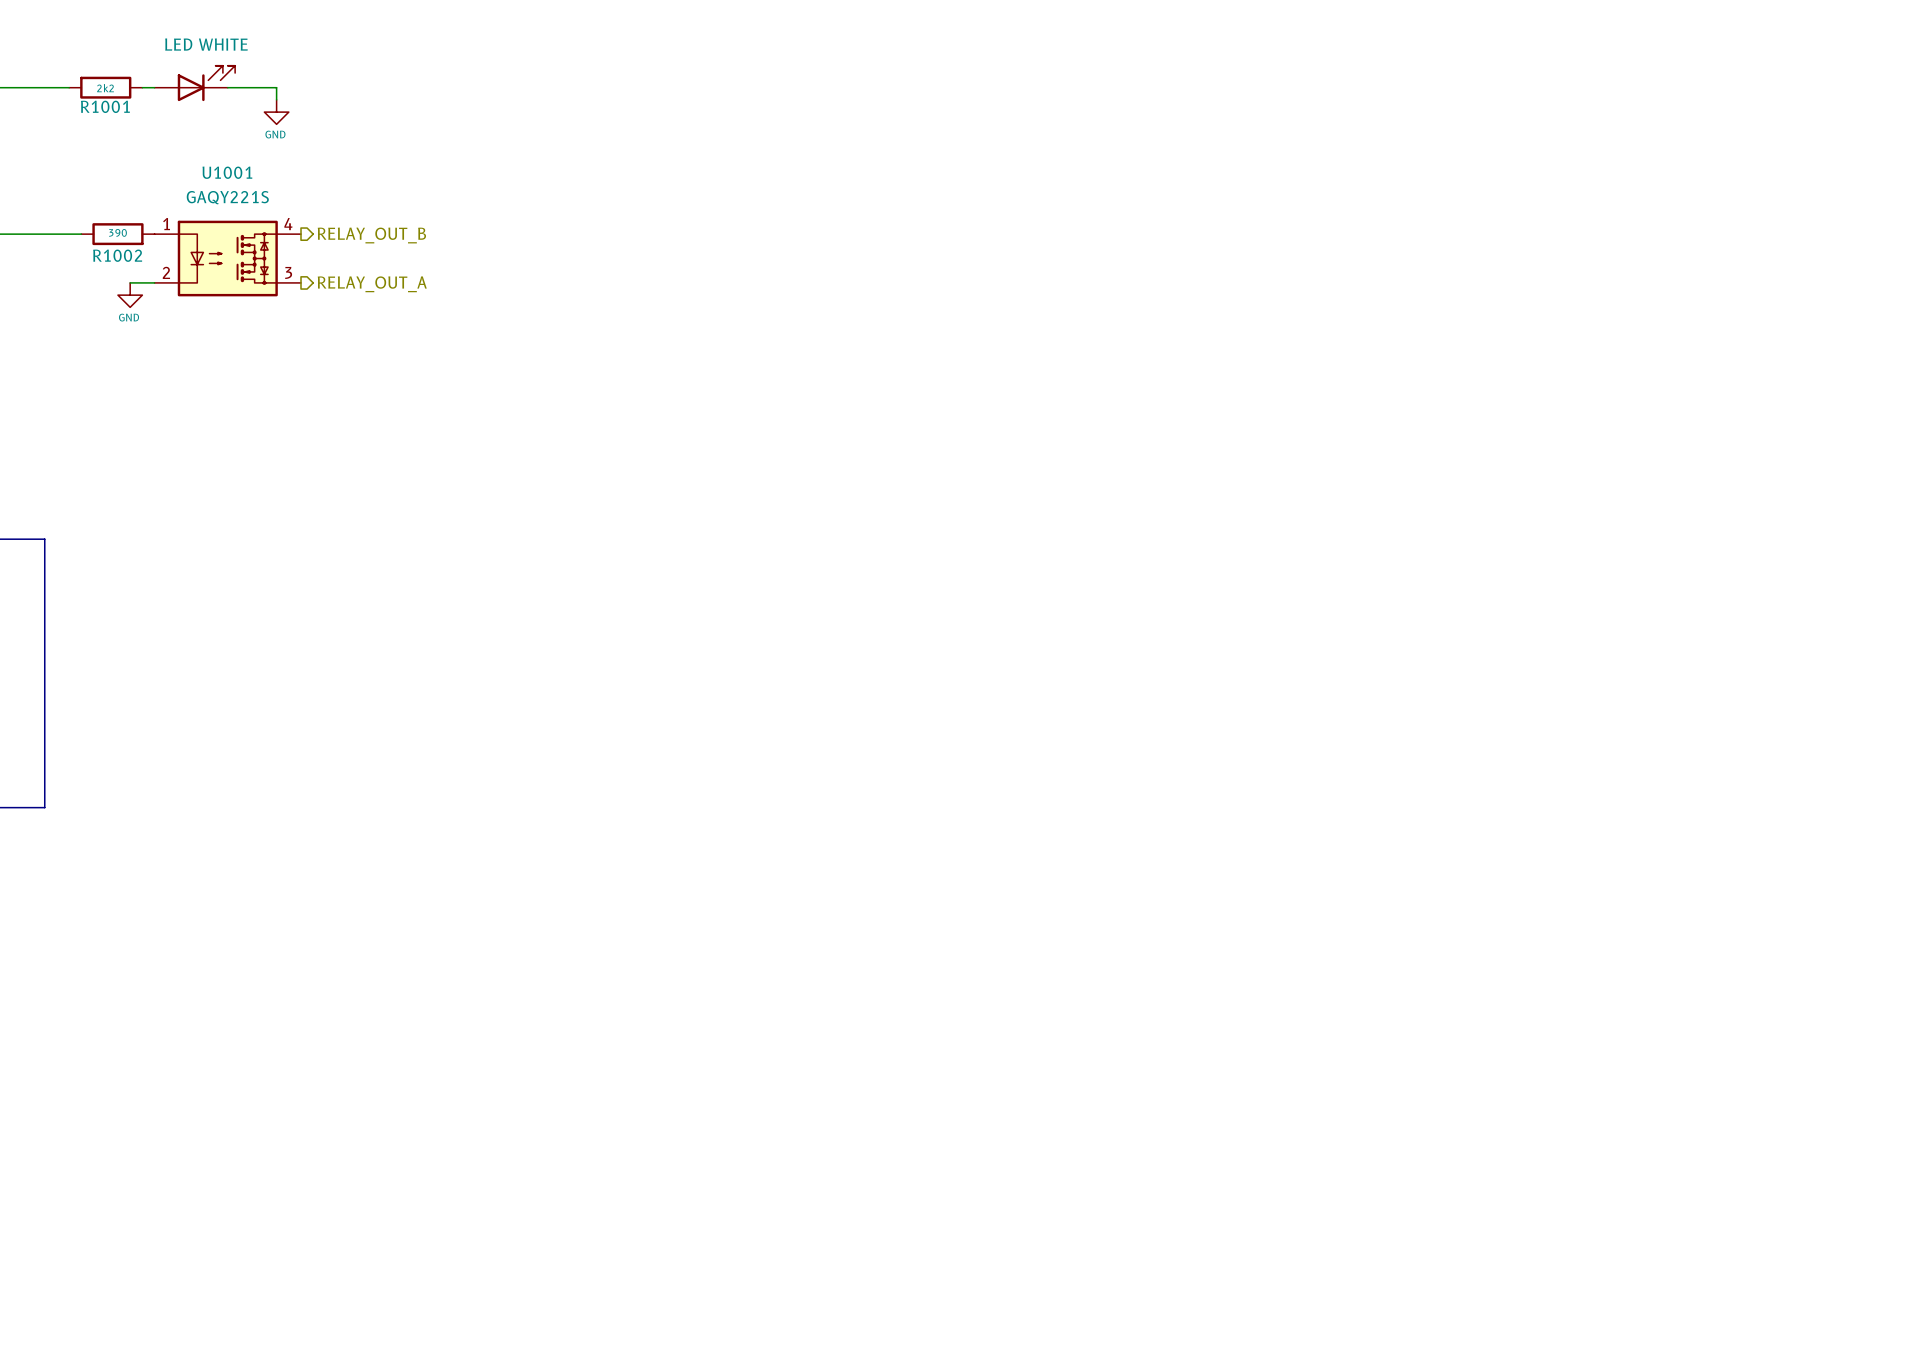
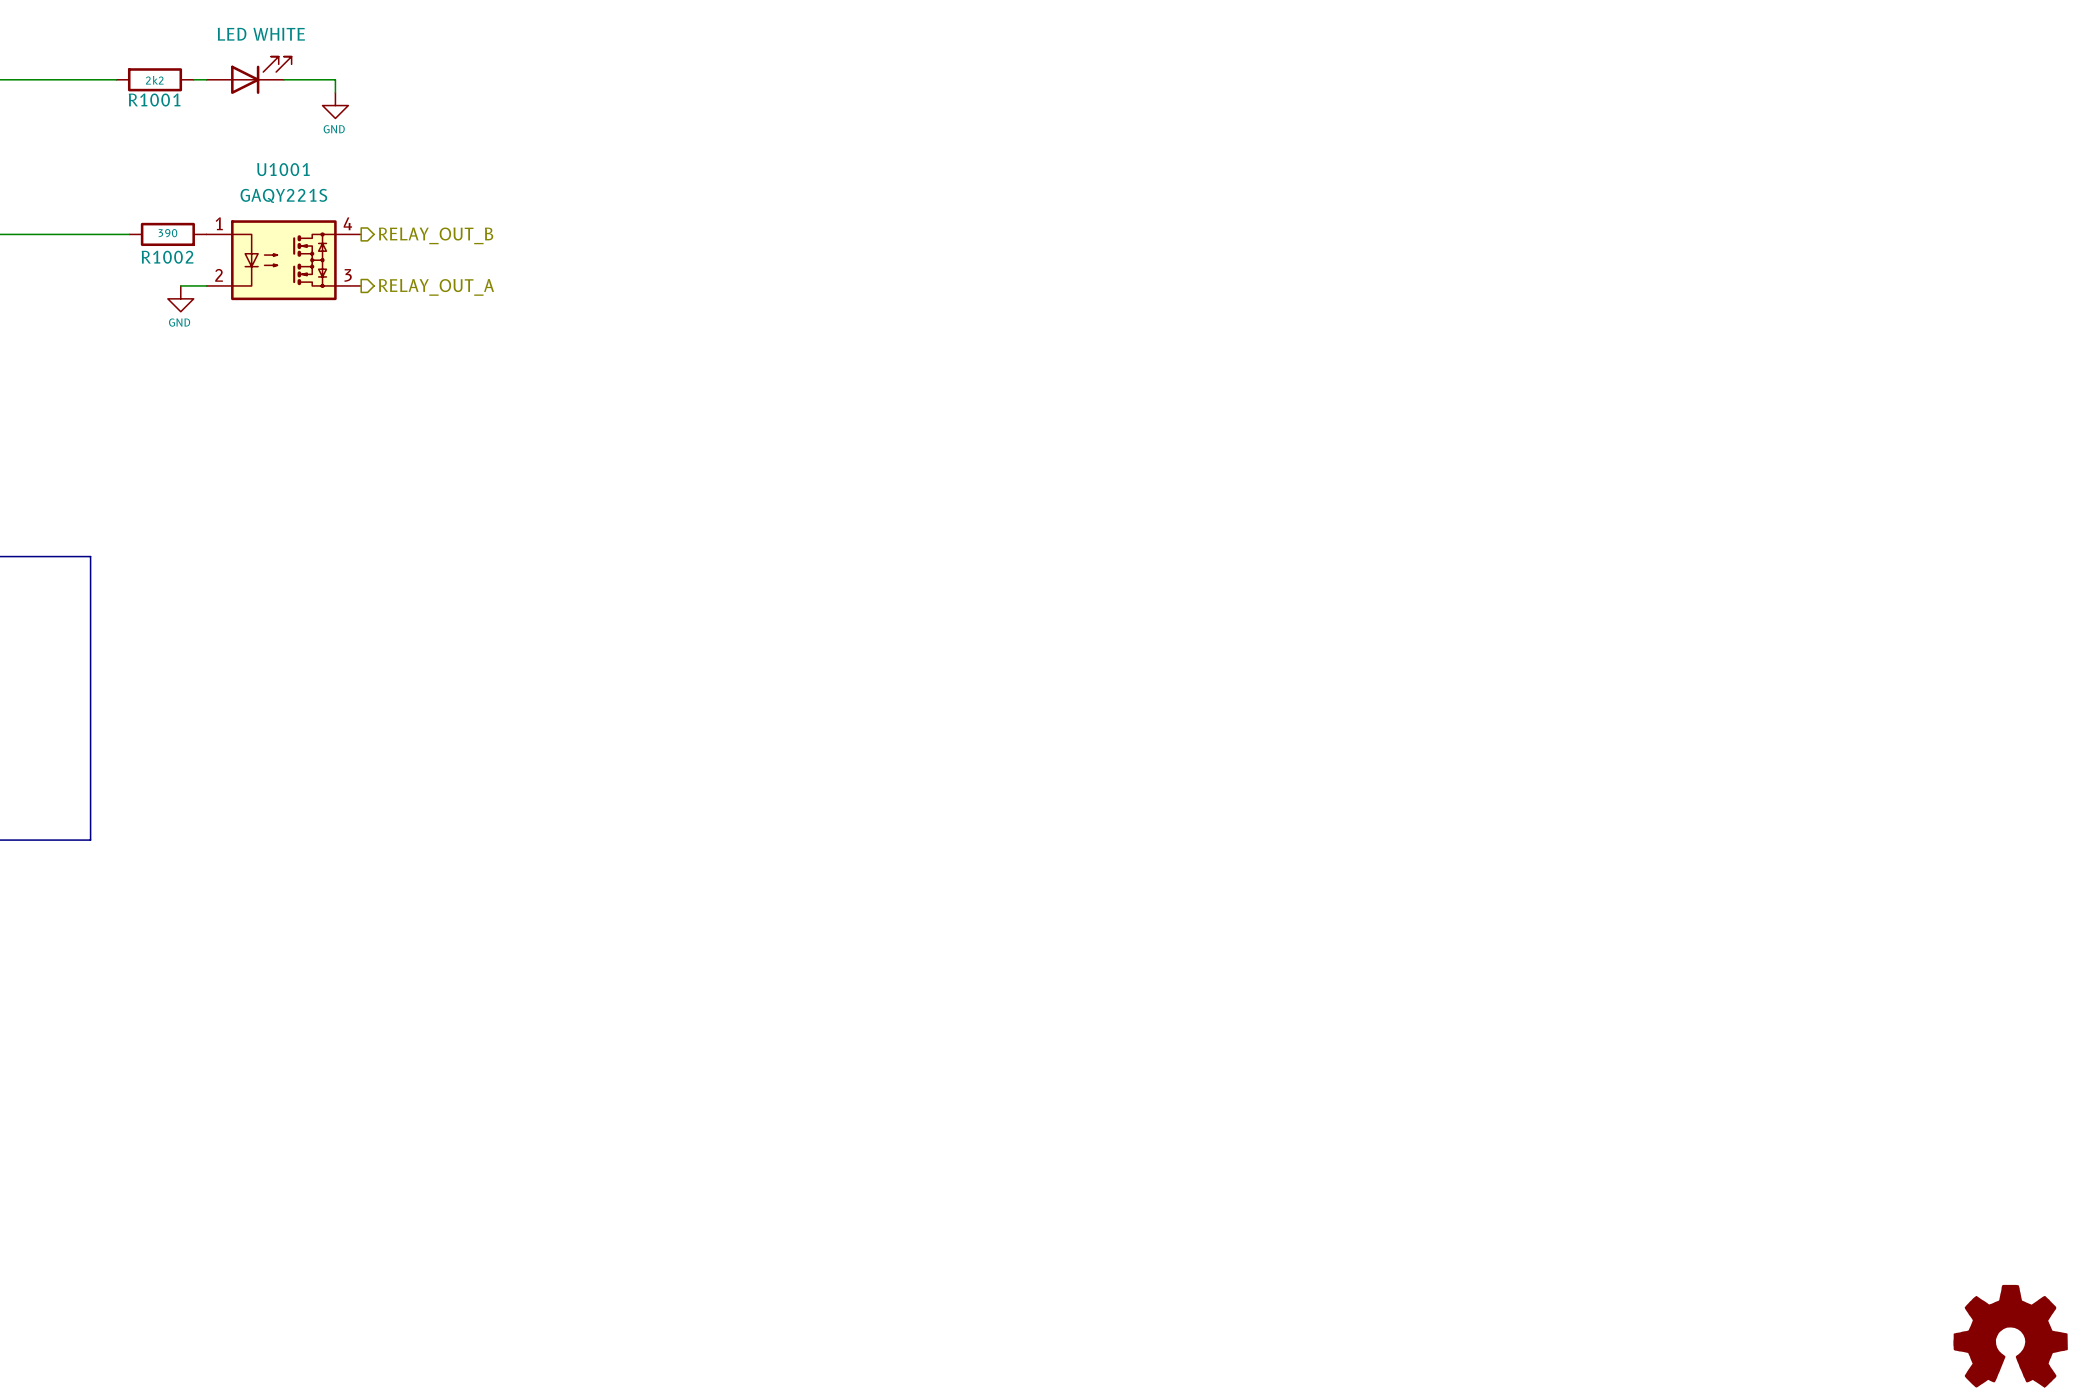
power symbol: none -> (2010, 1336)

